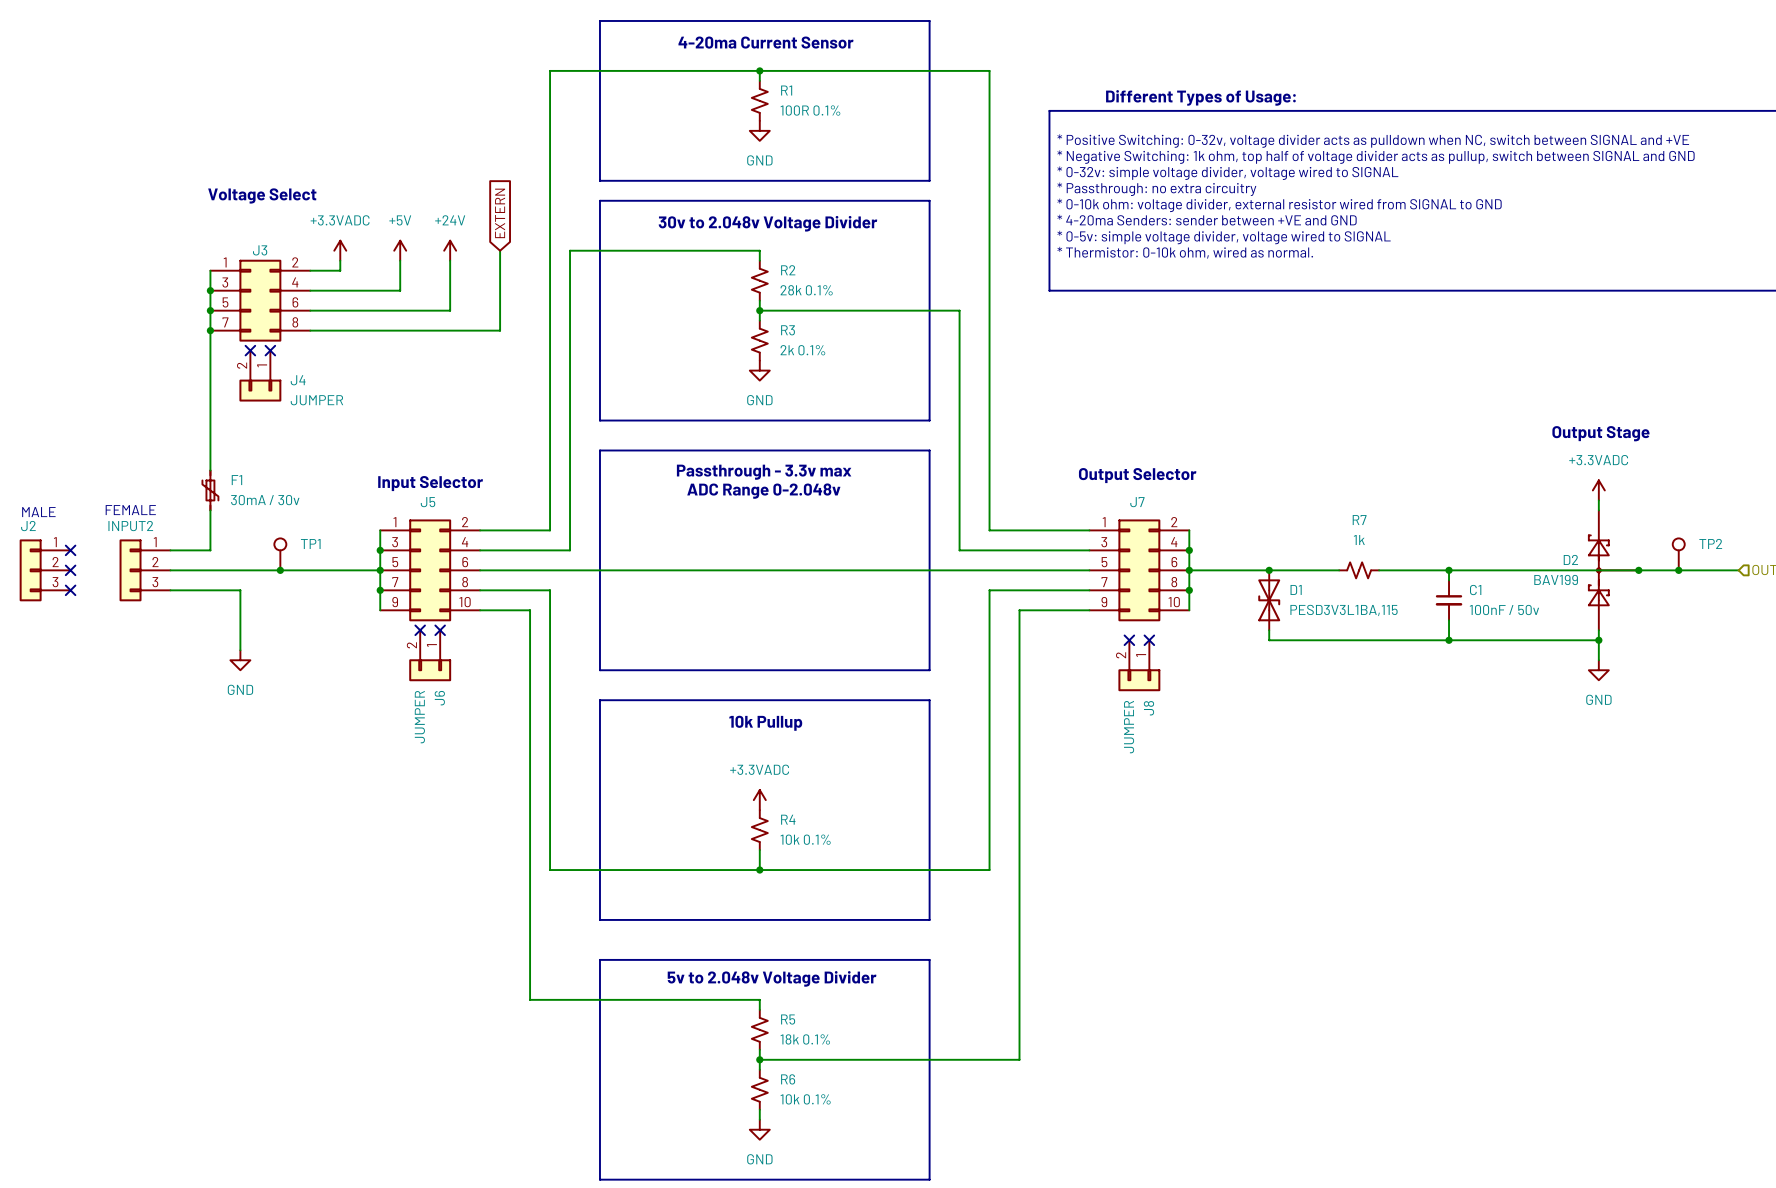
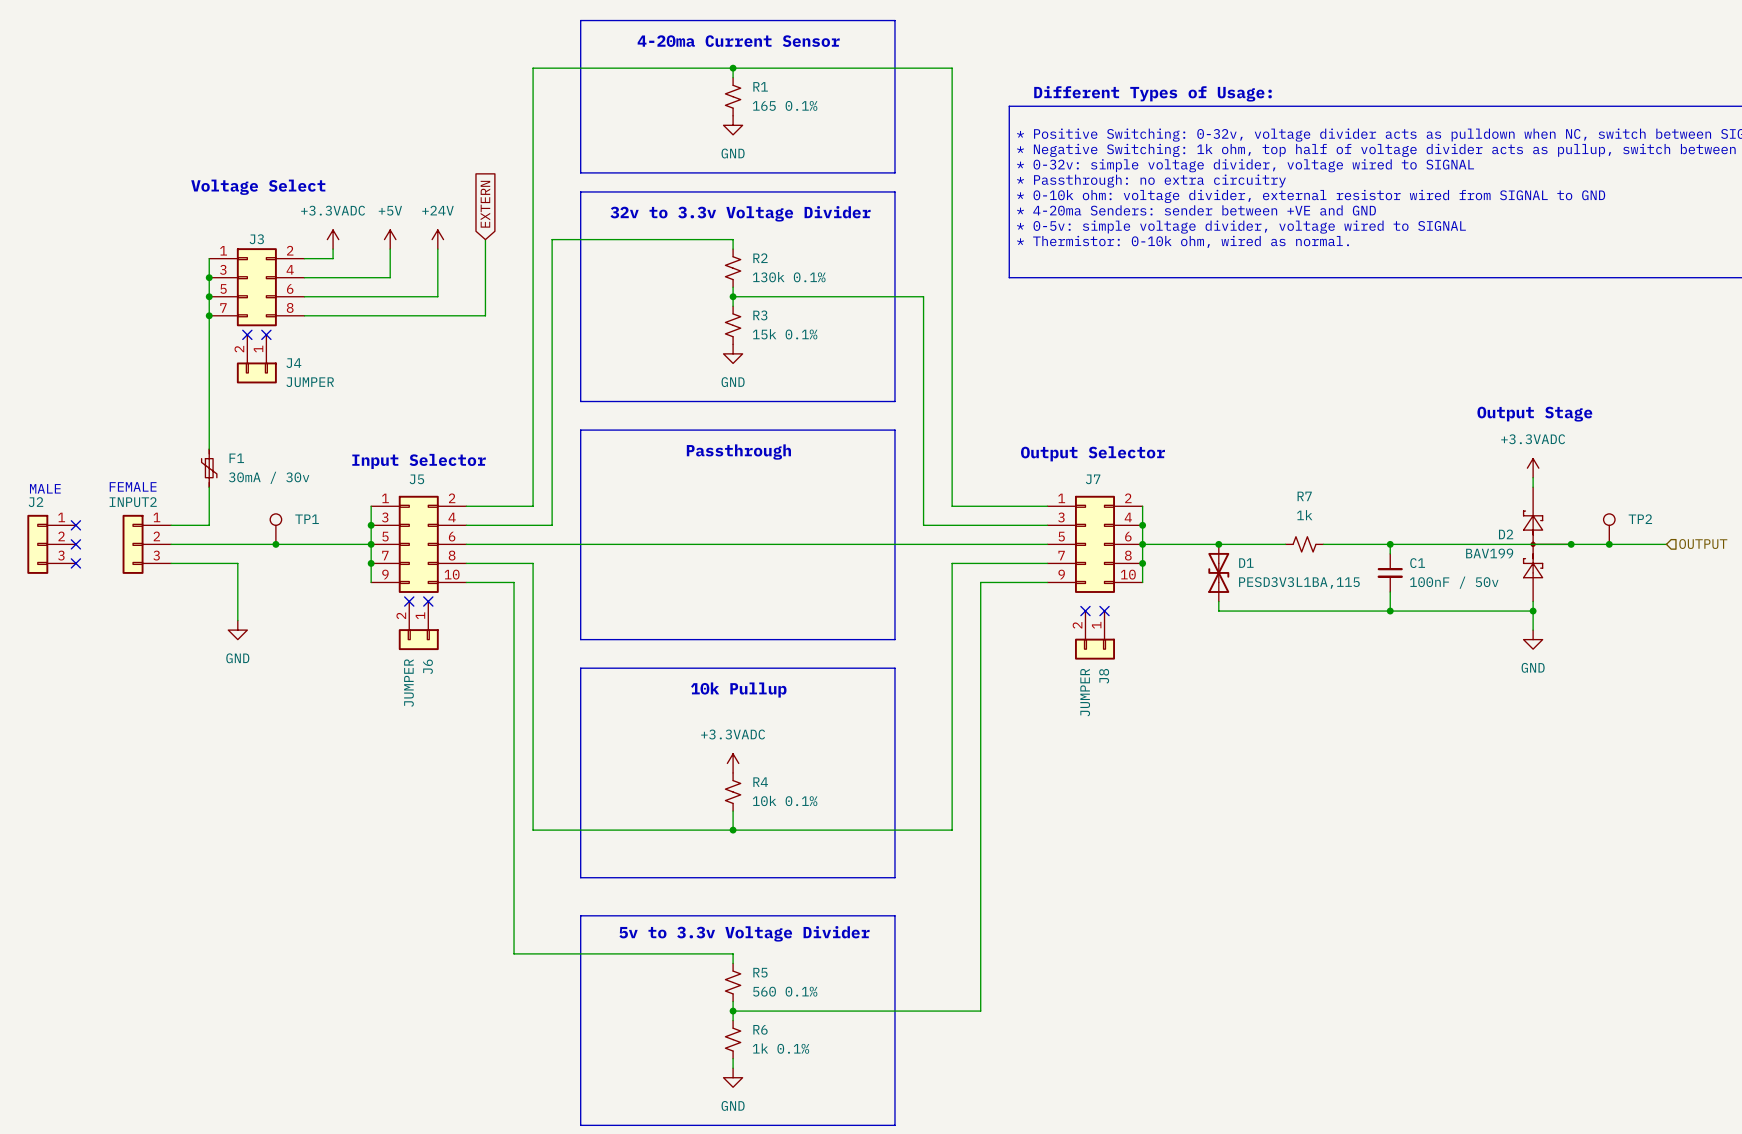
R1 value: 100R 0.1% (810, 110) -> 165 0.1% (785, 105)
text: 30v to 2.048v Voltage Divider (767, 223) -> 32v to 3.3v Voltage Divider (740, 213)
R2 value: 28k 0.1% (806, 290) -> 130k 0.1% (789, 277)
R3 value: 2k 0.1% (802, 350) -> 15k 0.1% (785, 334)
text: Passthrough - 3.3v max (764, 472) -> Passthrough (738, 452)
text: ADC Range 0-2.048v (763, 491) -> none
text: 5v to 2.048v Voltage Divider (772, 978) -> 5v to 3.3v Voltage Divider (744, 933)
R5 value: 18k 0.1% (805, 1039) -> 560 0.1% (785, 991)
R6 value: 10k 0.1% (805, 1099) -> 1k 0.1% (781, 1048)

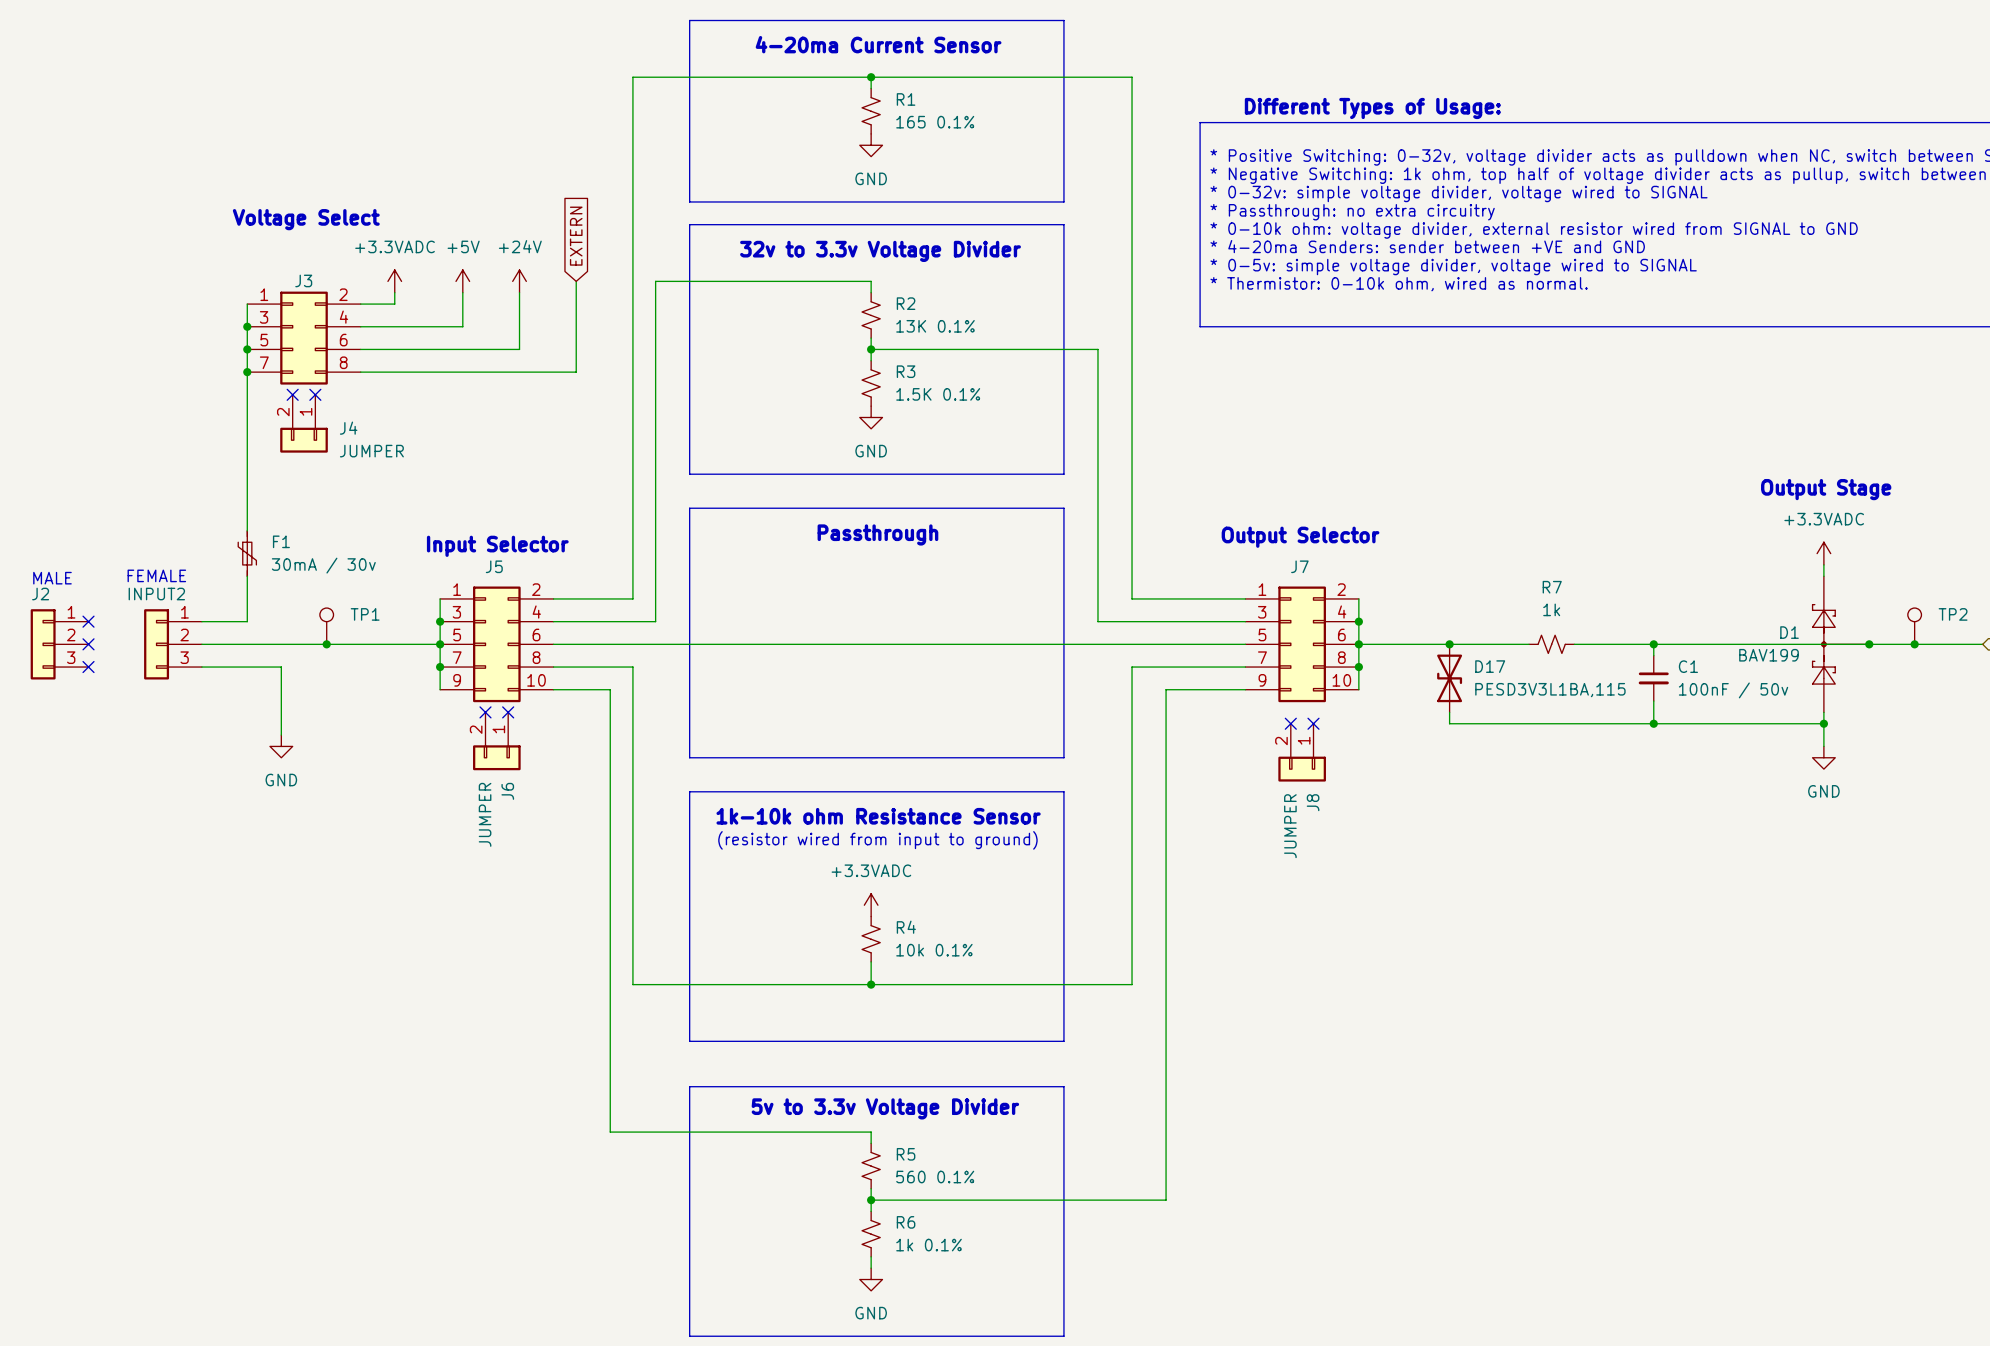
R2 value: 130k 0.1% (789, 277) -> 13K 0.1% (935, 326)
R3 value: 15k 0.1% (785, 334) -> 1.5K 0.1% (938, 394)
D2 name: D2 (1506, 534) -> D1 (1789, 632)
D1 name: D1 (1246, 563) -> D17 (1490, 666)
text: 10k Pullup (738, 690) -> 1k-10k ohm Resistance Sensor (878, 816)
text: none -> (resistor wired from input to ground) (877, 840)

